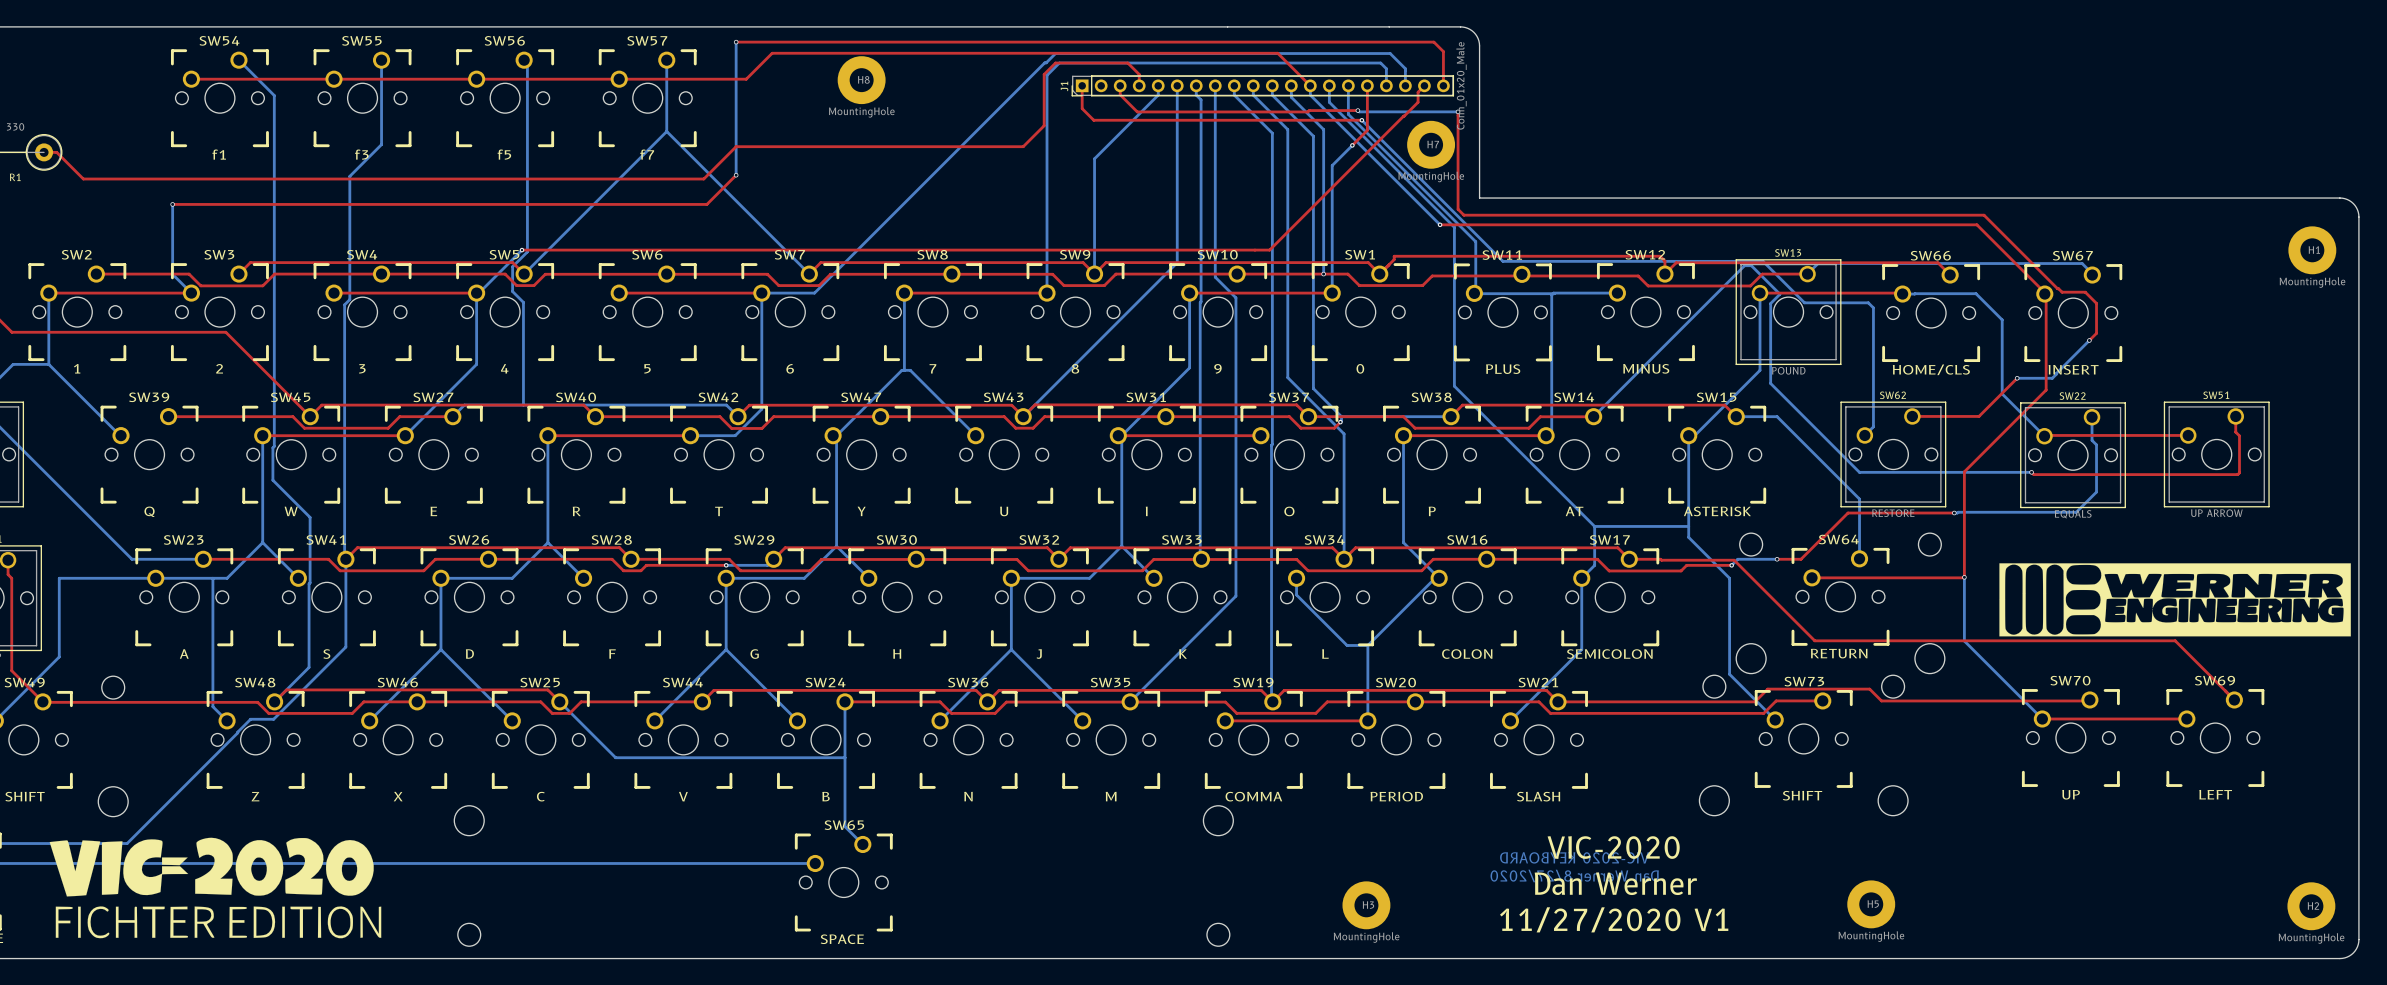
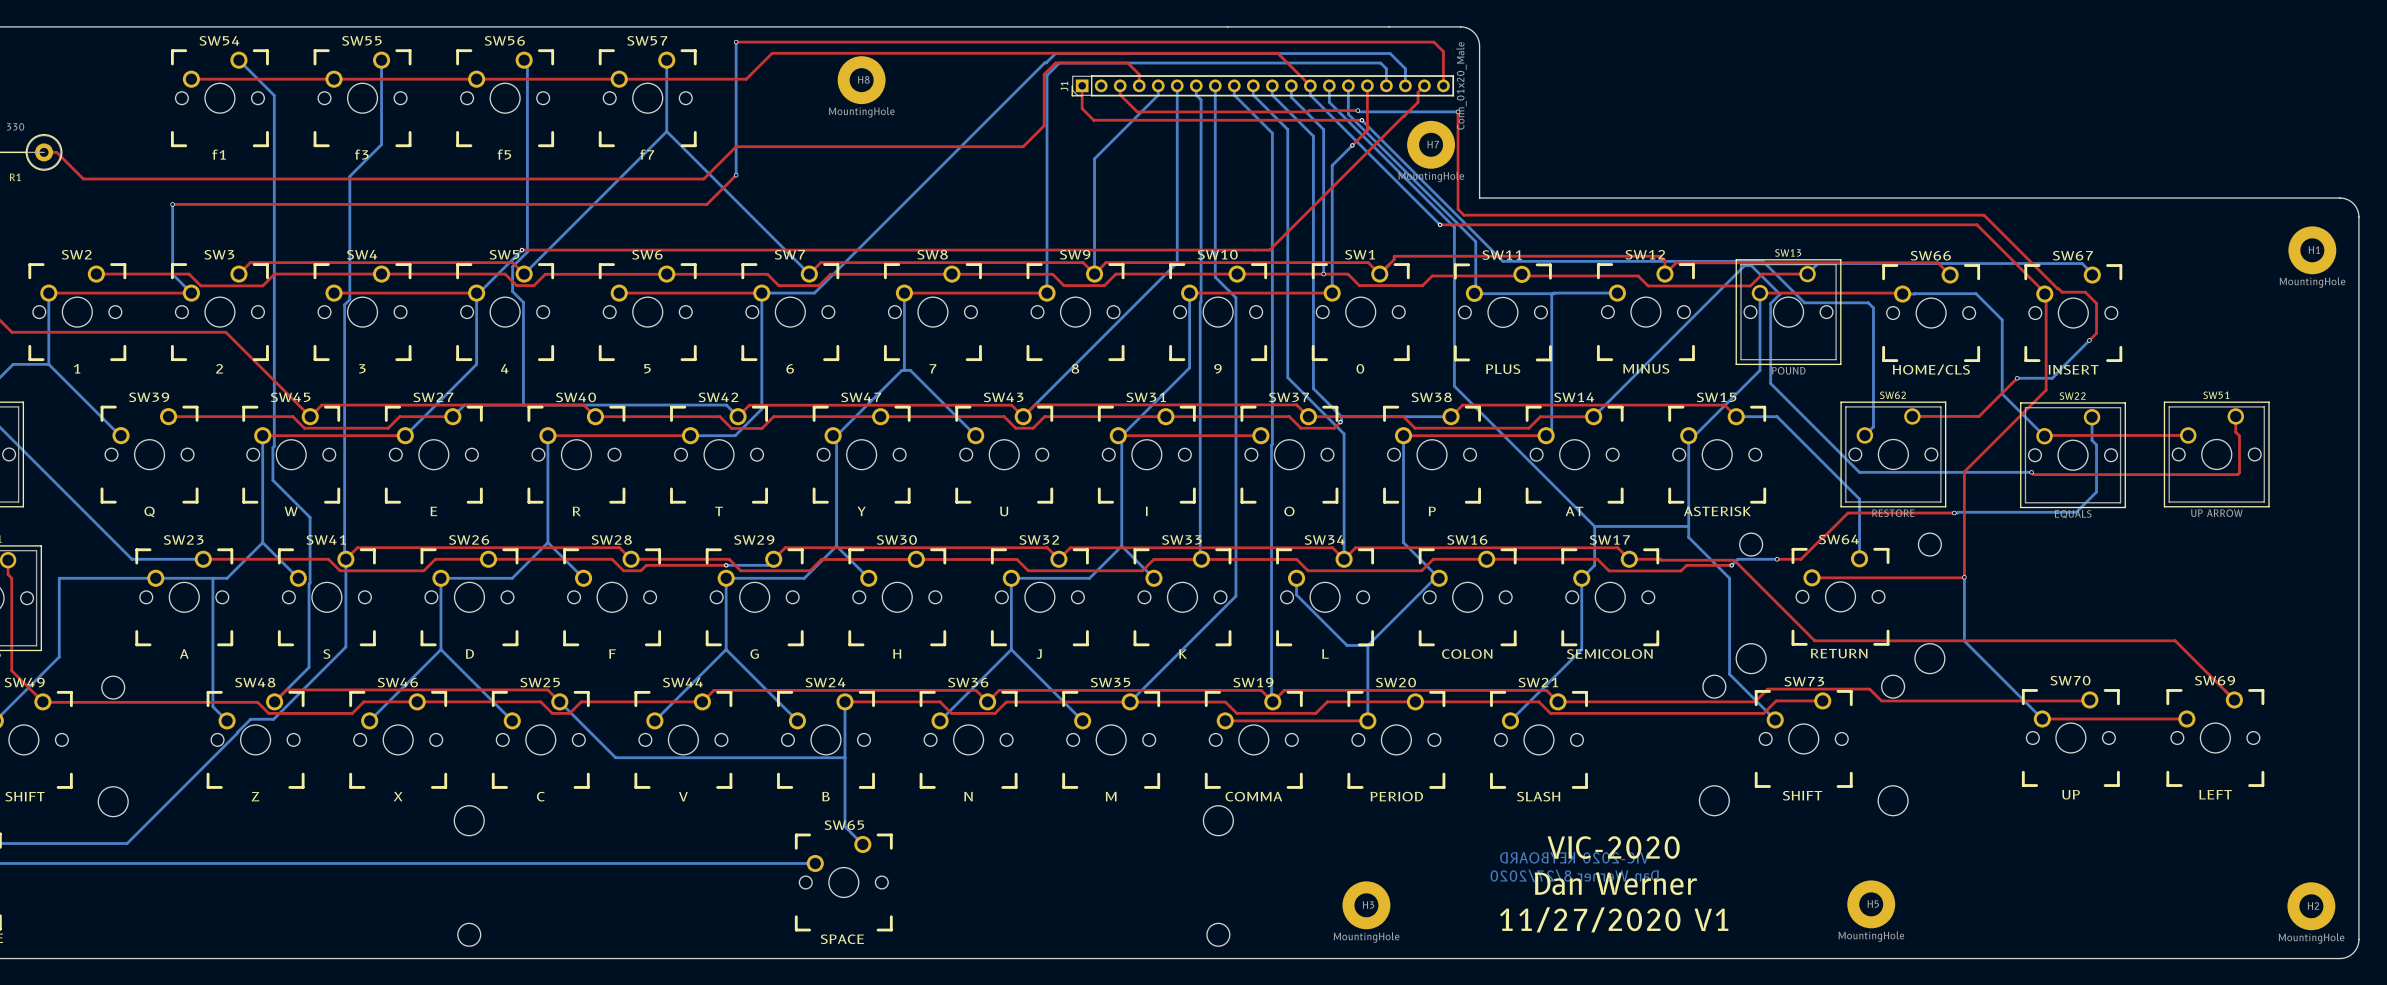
drawing: [1999, 563, 2351, 637] -> none
drawing: [49, 837, 382, 939] -> none

